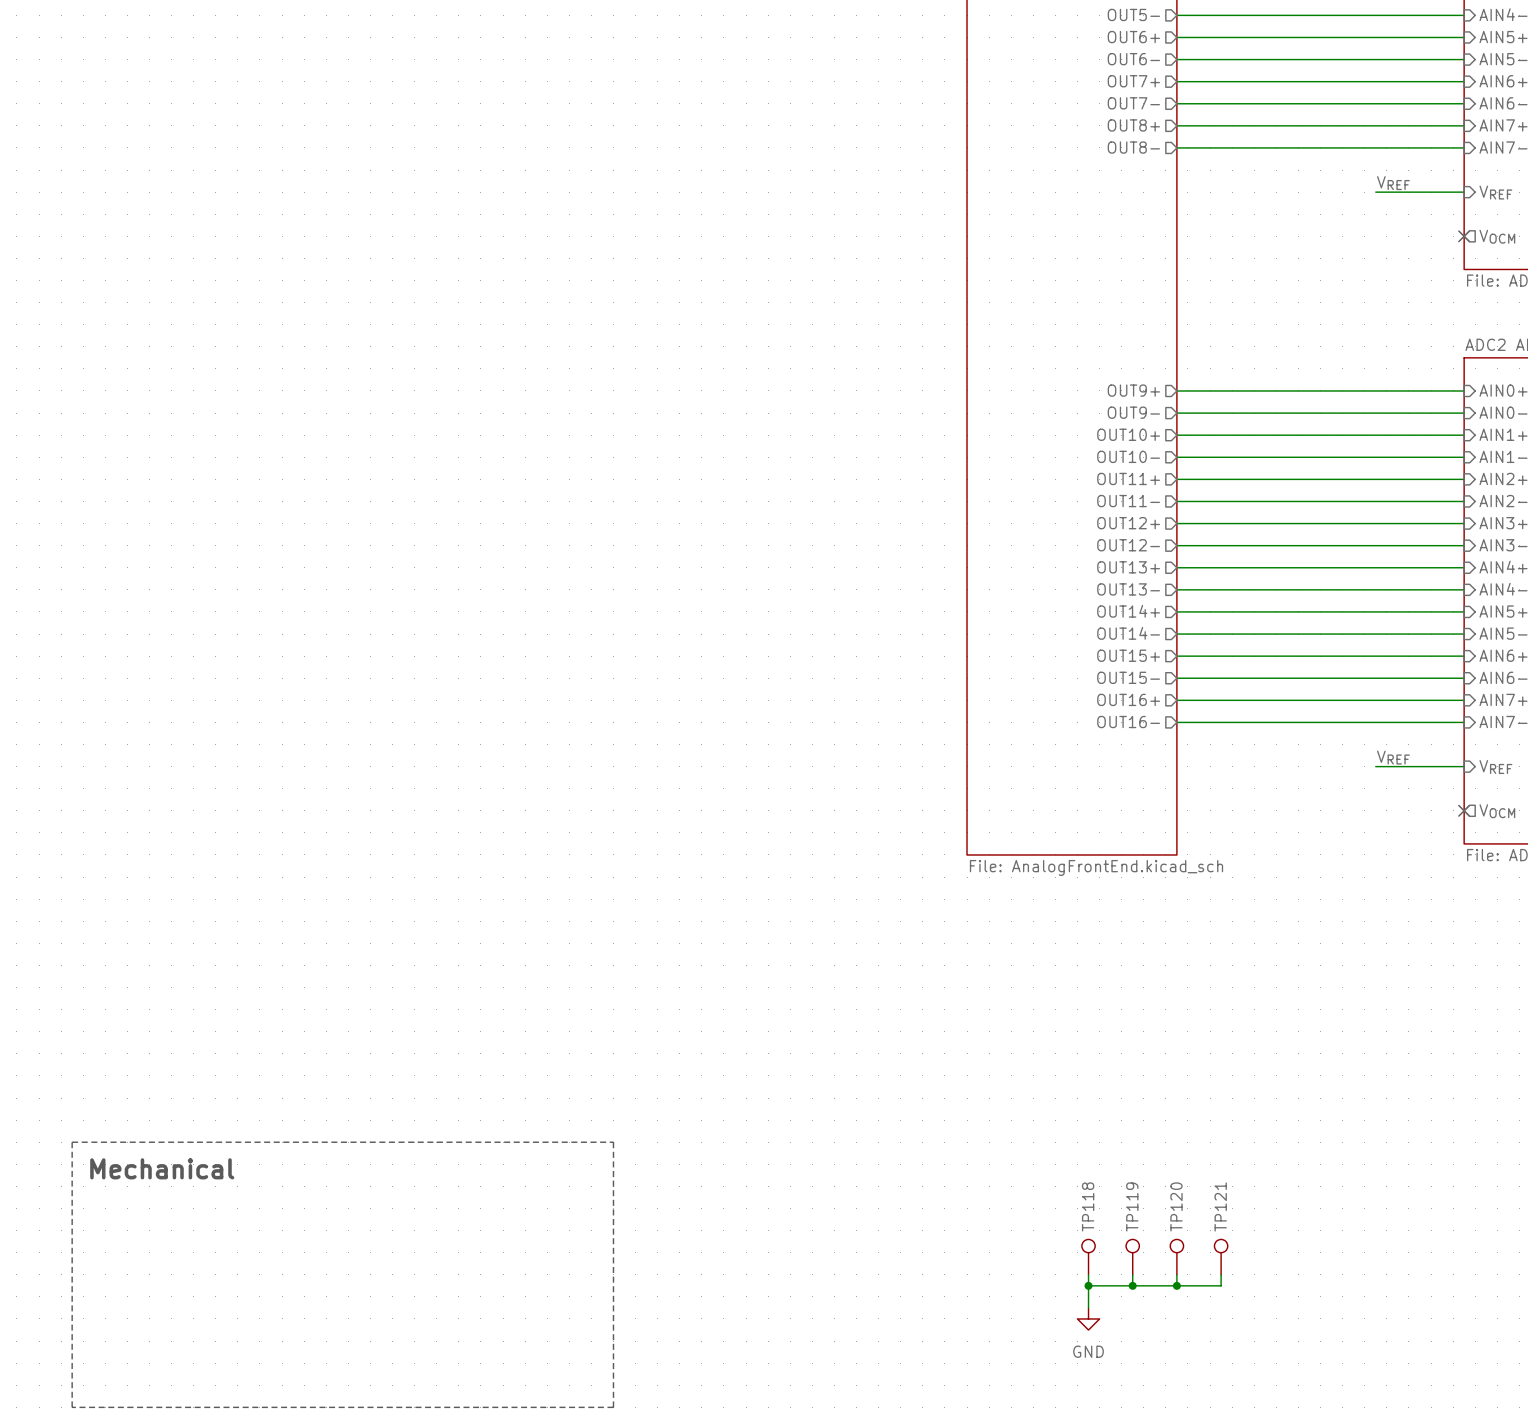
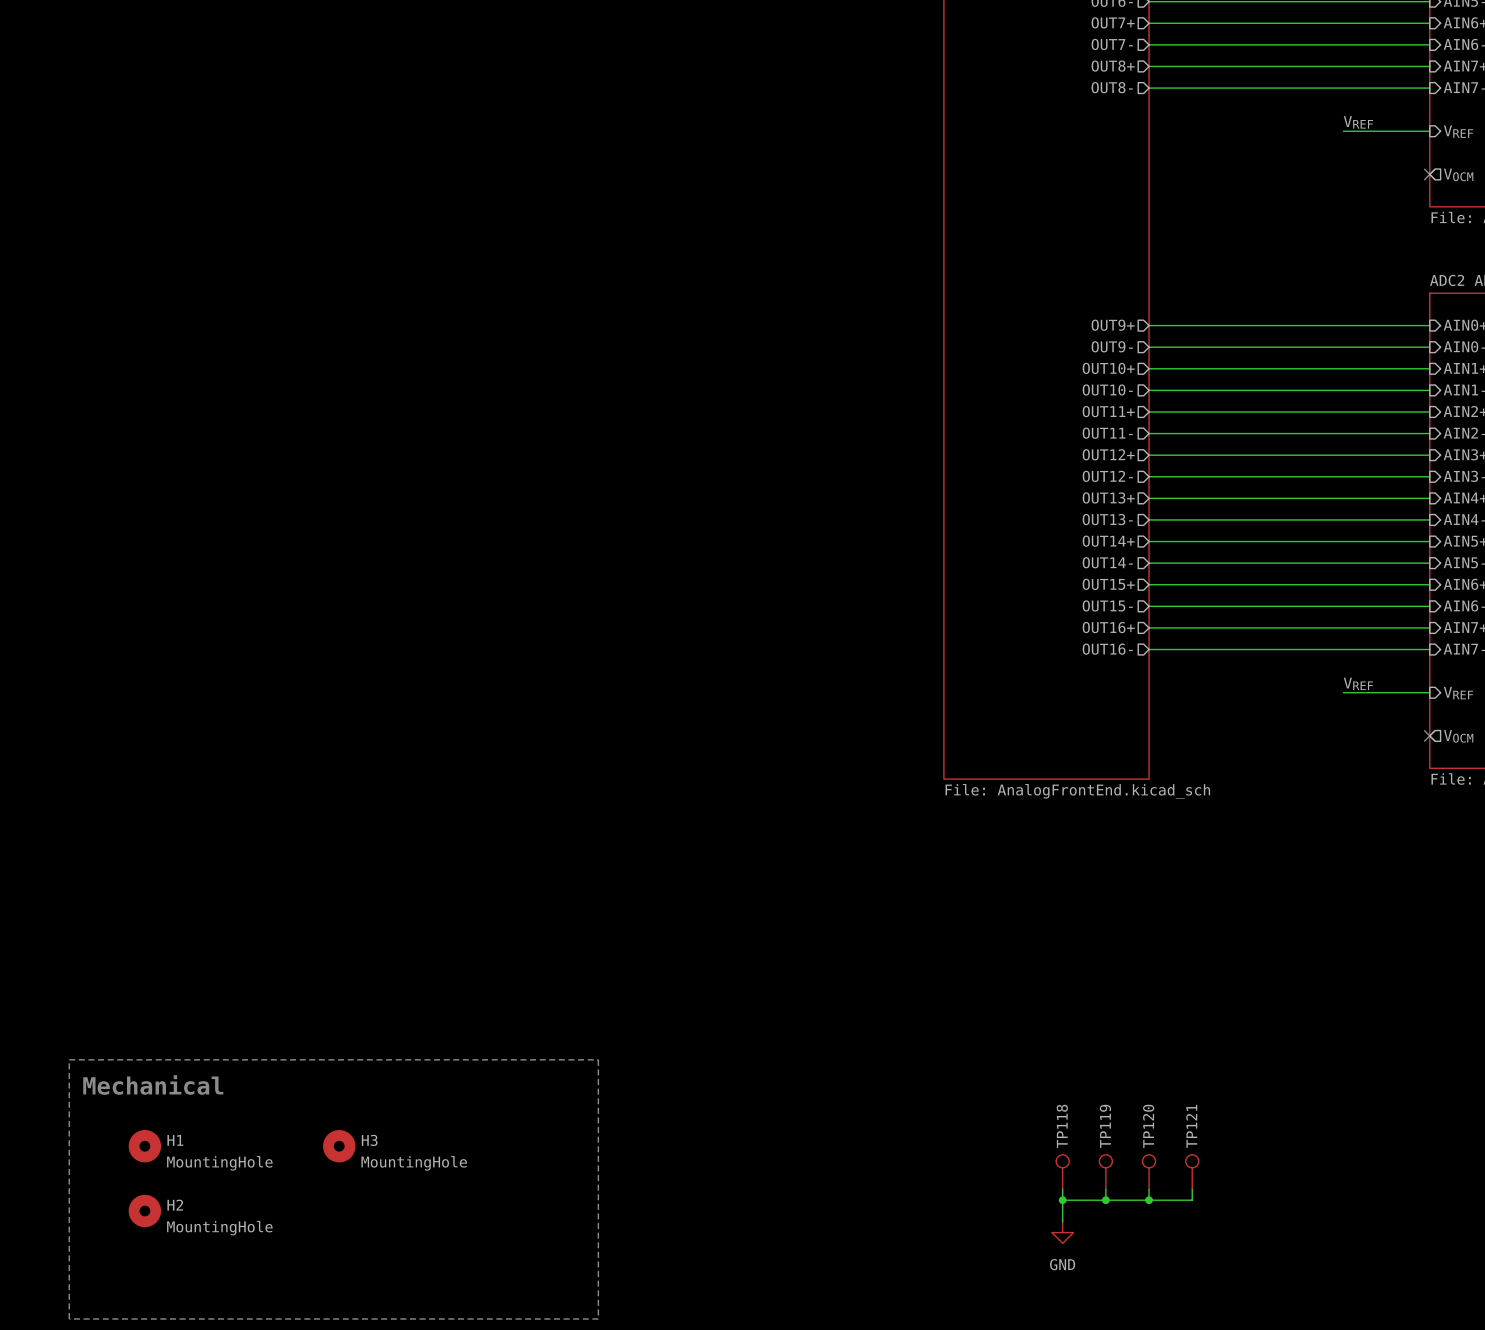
H1: none -> MountingHole (144, 1146)
H3: none -> MountingHole (339, 1146)
H2: none -> MountingHole (144, 1211)

